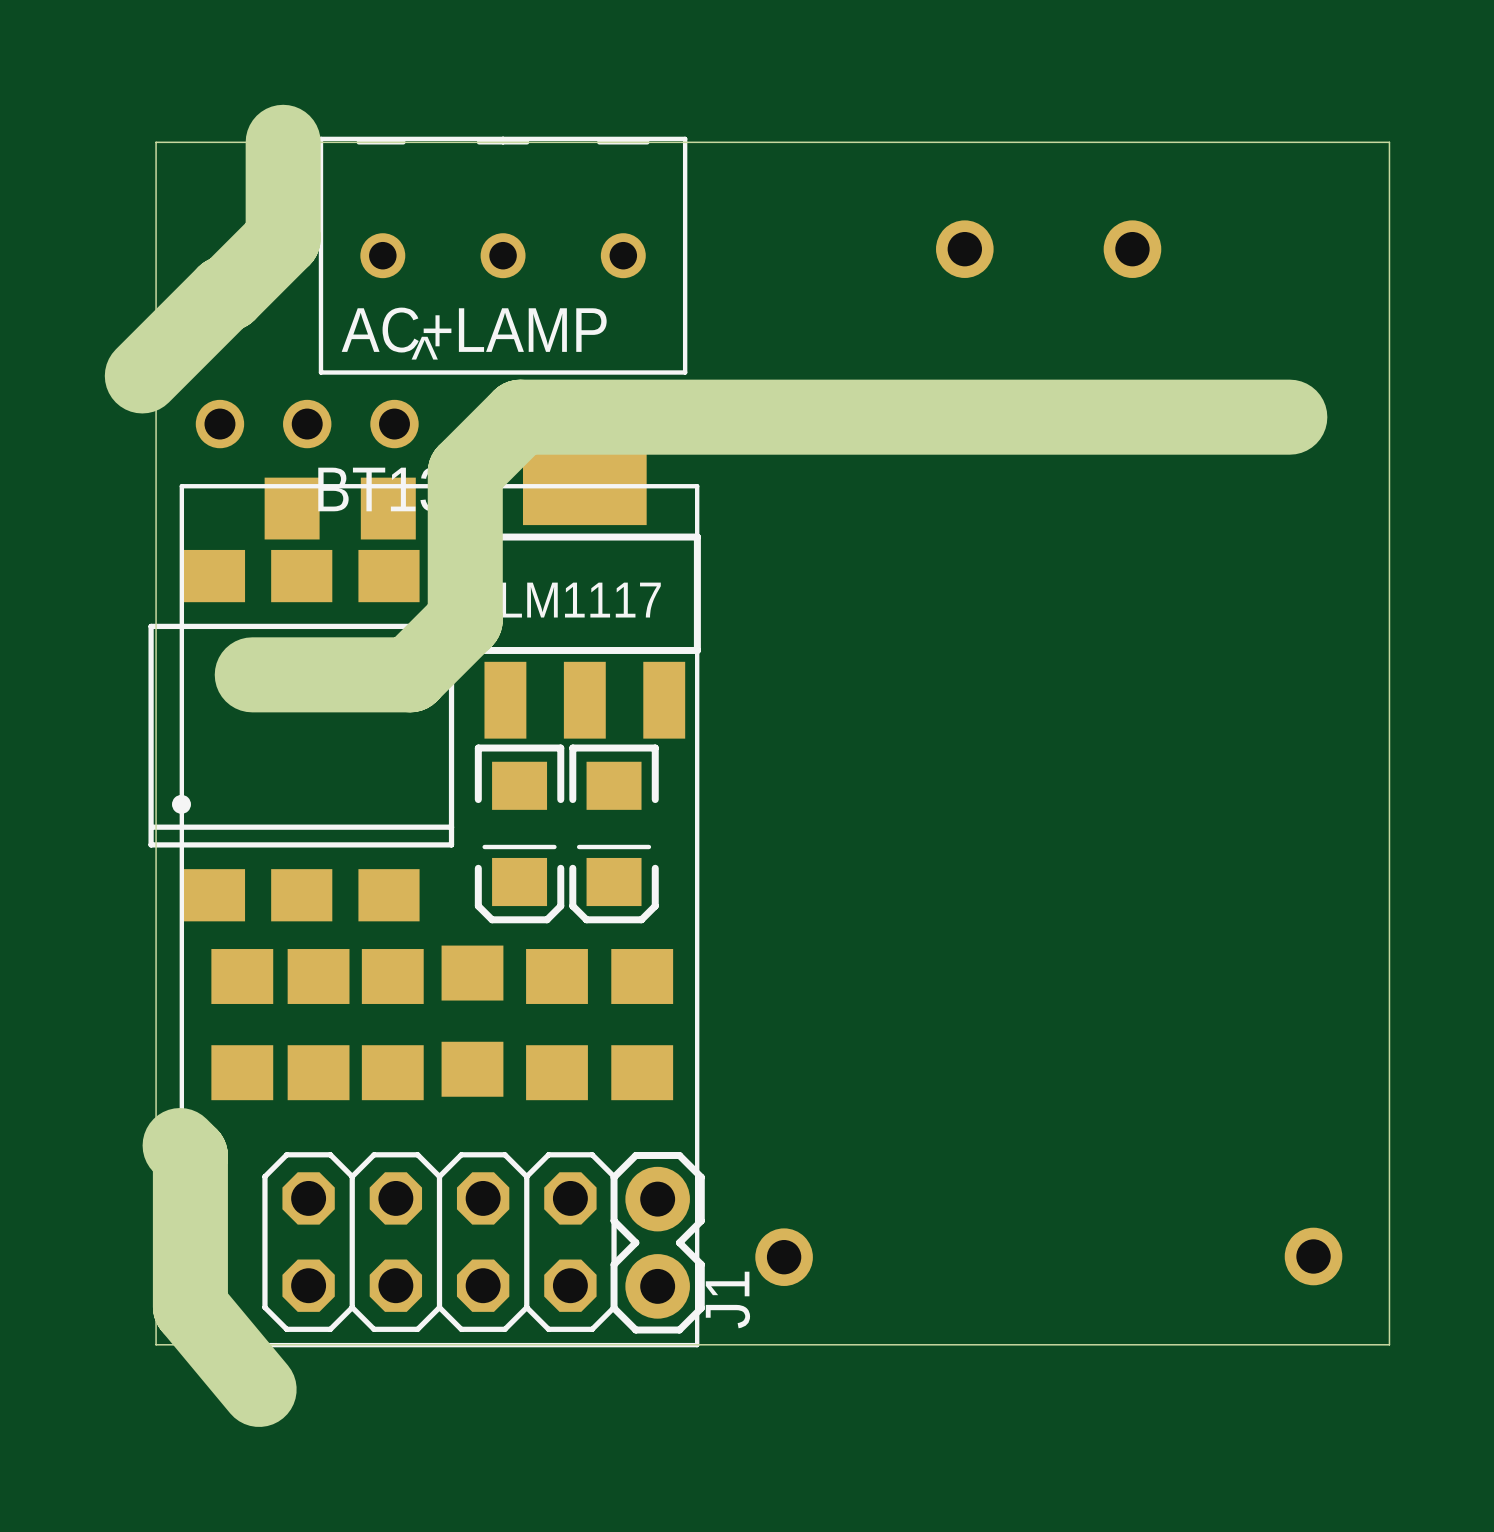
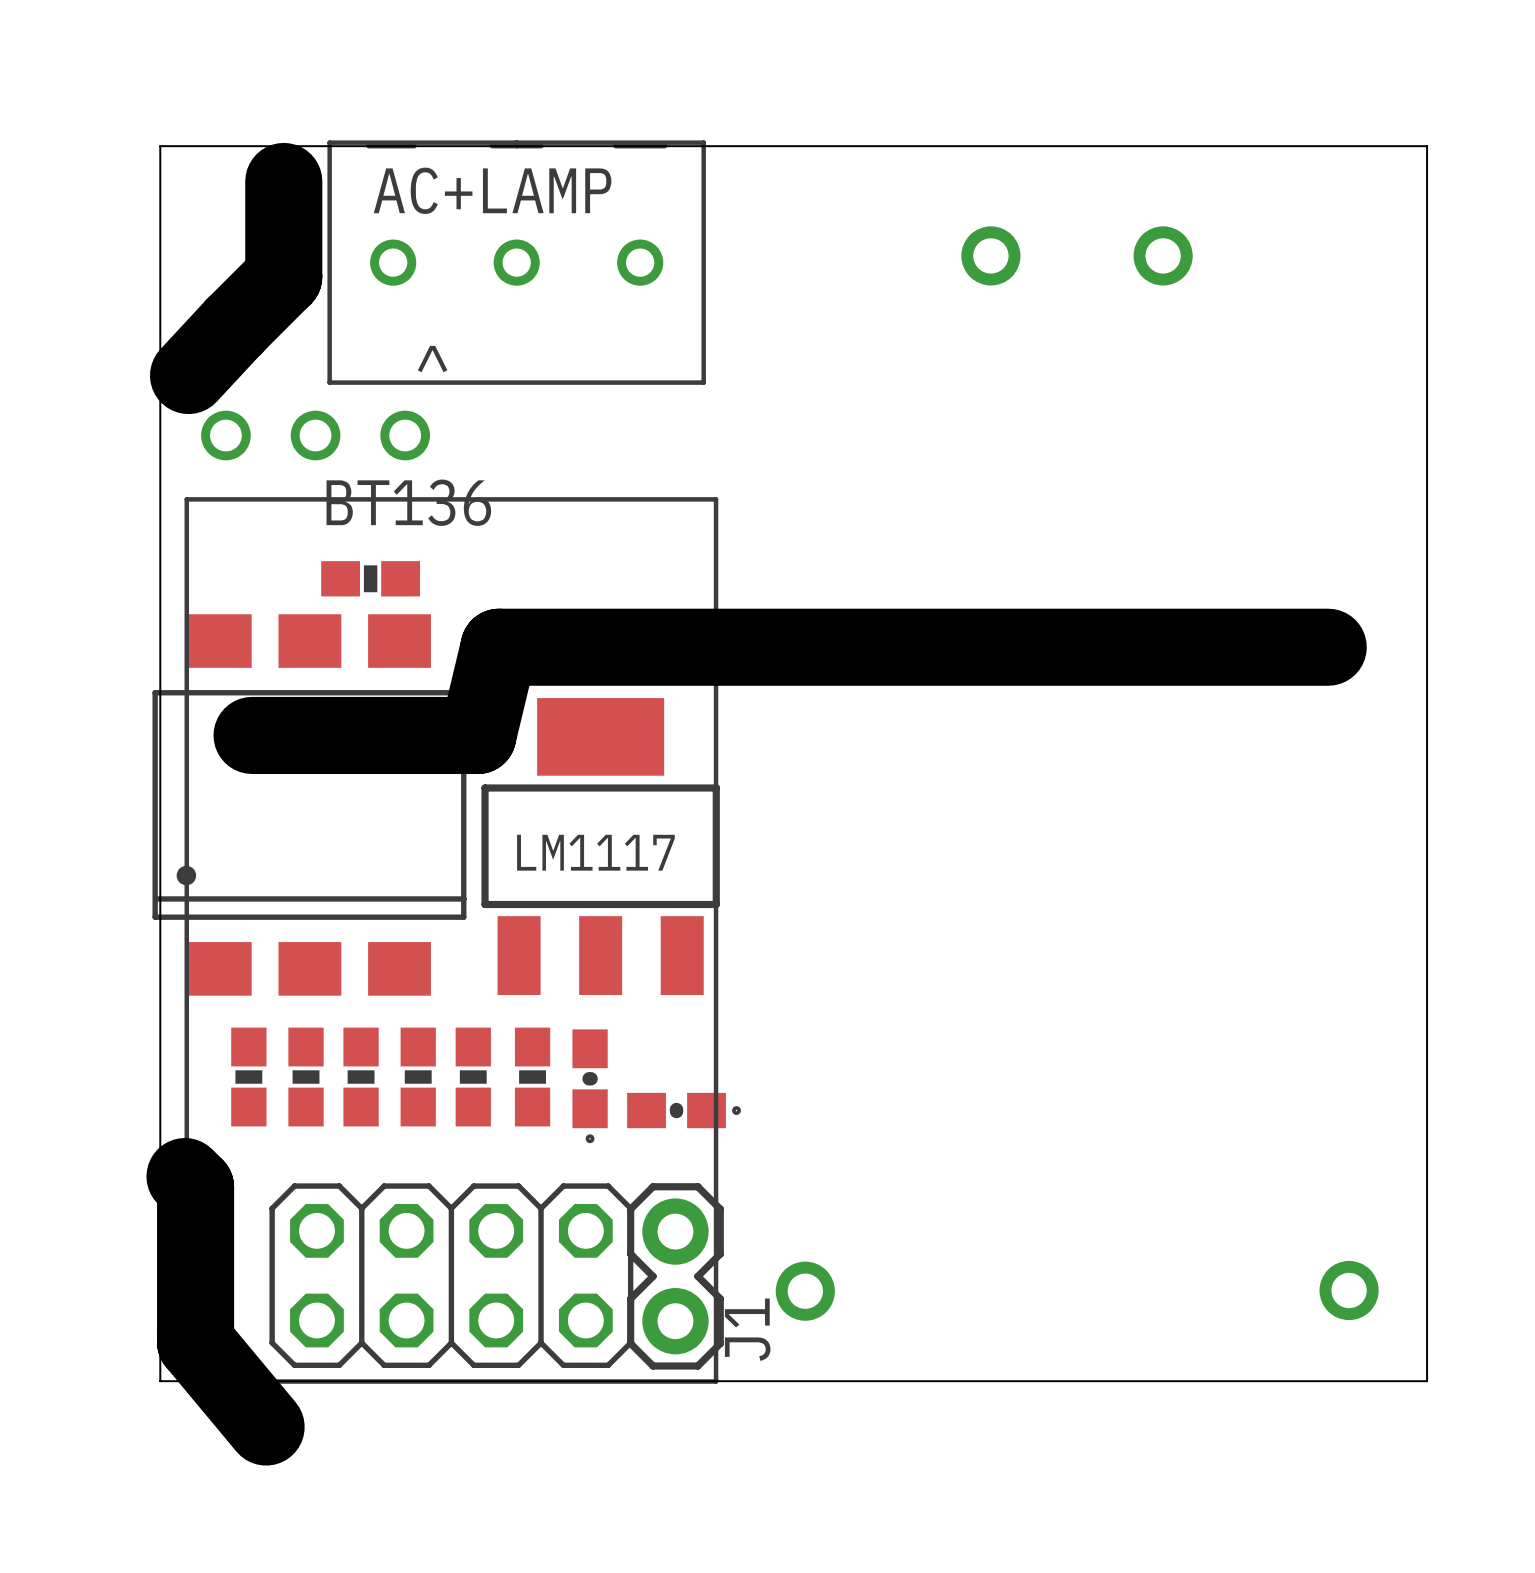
board edge: (283, 142) (283, 238) (142, 375) -> none
board edge: none -> (283, 181) (283, 276) (188, 375)
AC+LAMP name position: AC+LAMP (474, 330) -> AC+LAMP (492, 190)
board edge: (1289, 417) (520, 417) (465, 472) (465, 619) (410, 674) (252, 674) -> none
part: (340, 508) -> none
part: none -> (370, 578)
LM1117 position: (584, 594) -> (600, 846)
board edge: none -> (1328, 647) (499, 647) (477, 735) (252, 735)
part position: (301, 735) -> (309, 804)
part: (519, 833) -> none
part: (614, 833) -> none
part footprint: [211, 949, 274, 1101] -> [231, 1027, 267, 1127]
part: (472, 1021) -> none
part: (318, 1024) -> none
part: (392, 1024) -> none
part: (557, 1024) -> none
part: (642, 1024) -> none
part: none -> (306, 1077)
part: none -> (361, 1077)
part: none -> (418, 1077)
part: none -> (473, 1077)
part: none -> (532, 1077)
part: none -> (590, 1086)
part: none -> (684, 1110)

